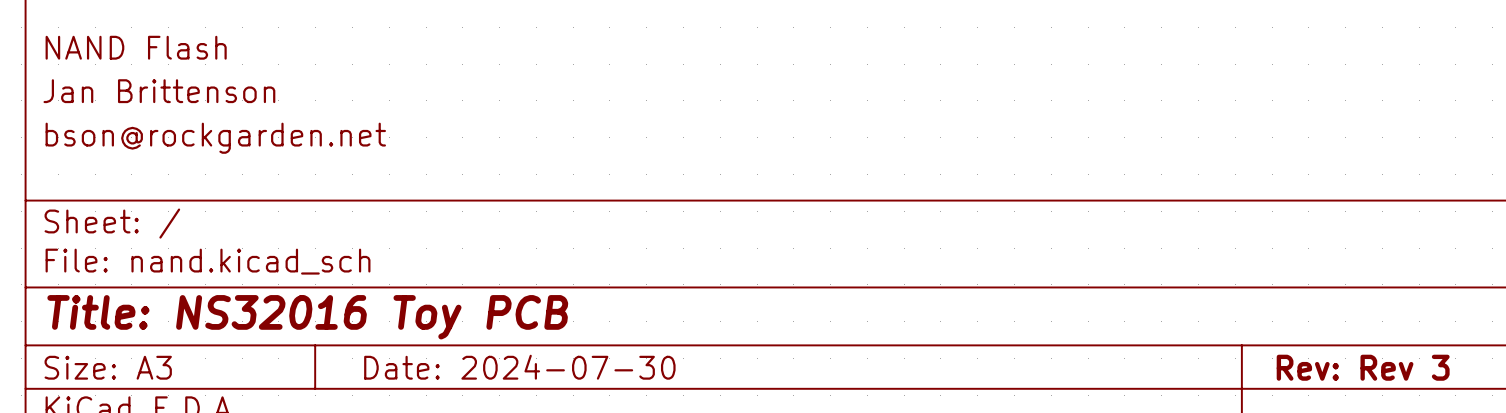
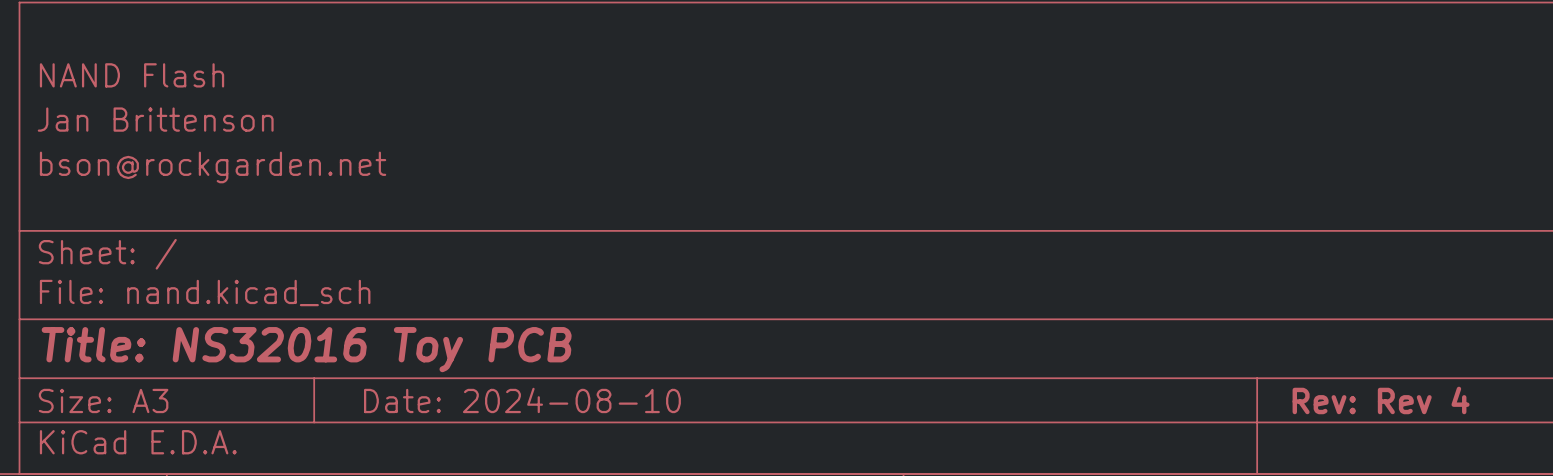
title block: Date: 2024-07-30 (519, 367) -> Date: 2024-08-10 (522, 400)
title block: Rev: Rev 3 (1363, 367) -> Rev: Rev 4 (1381, 400)

